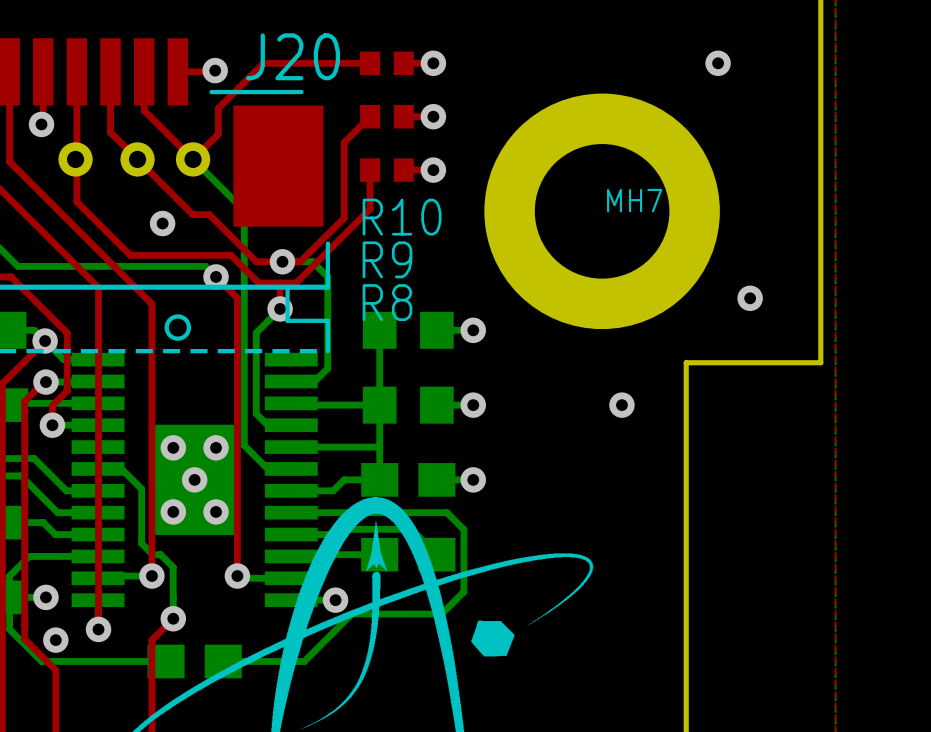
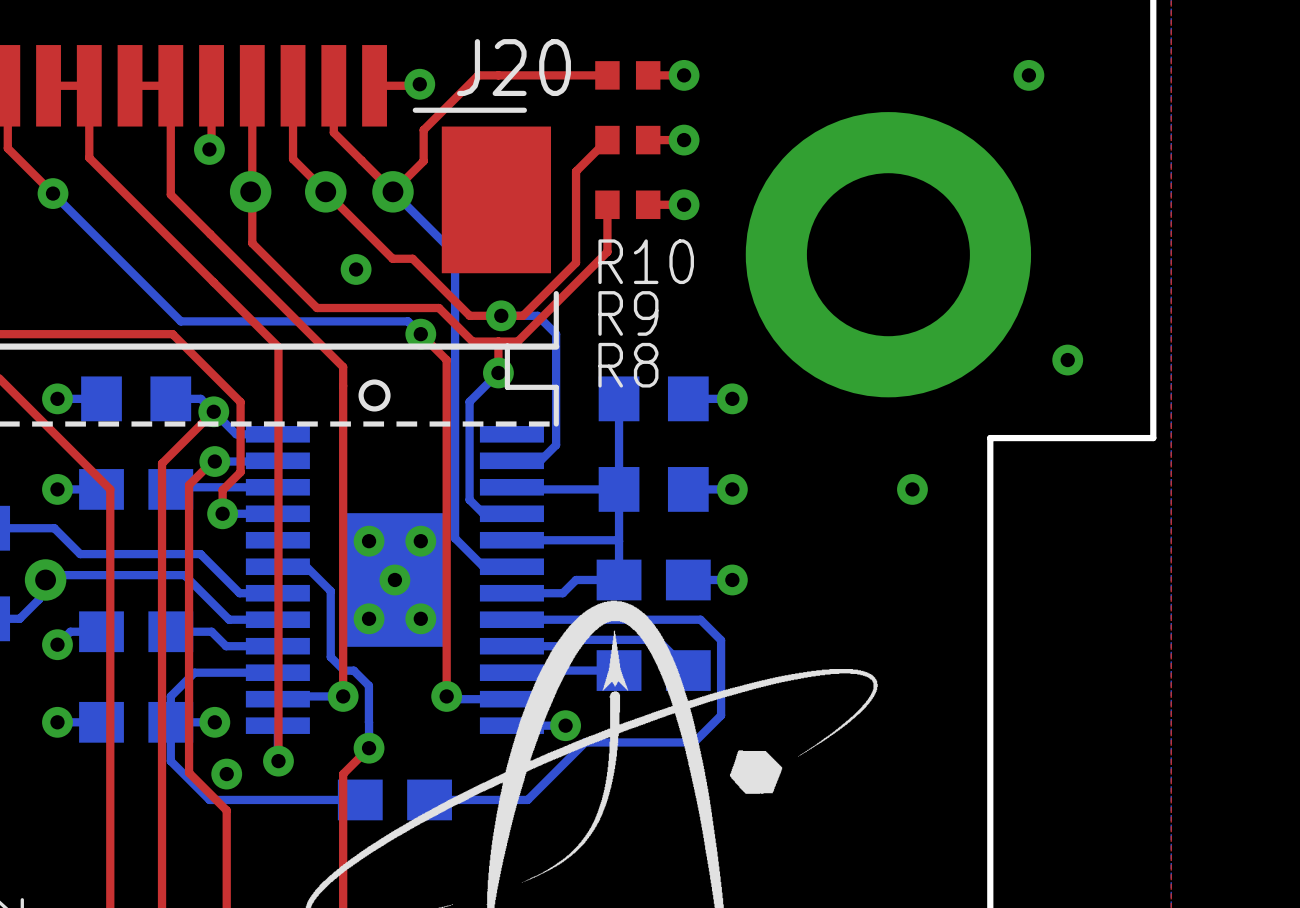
MH7 name: MH7 (634, 200) -> none

